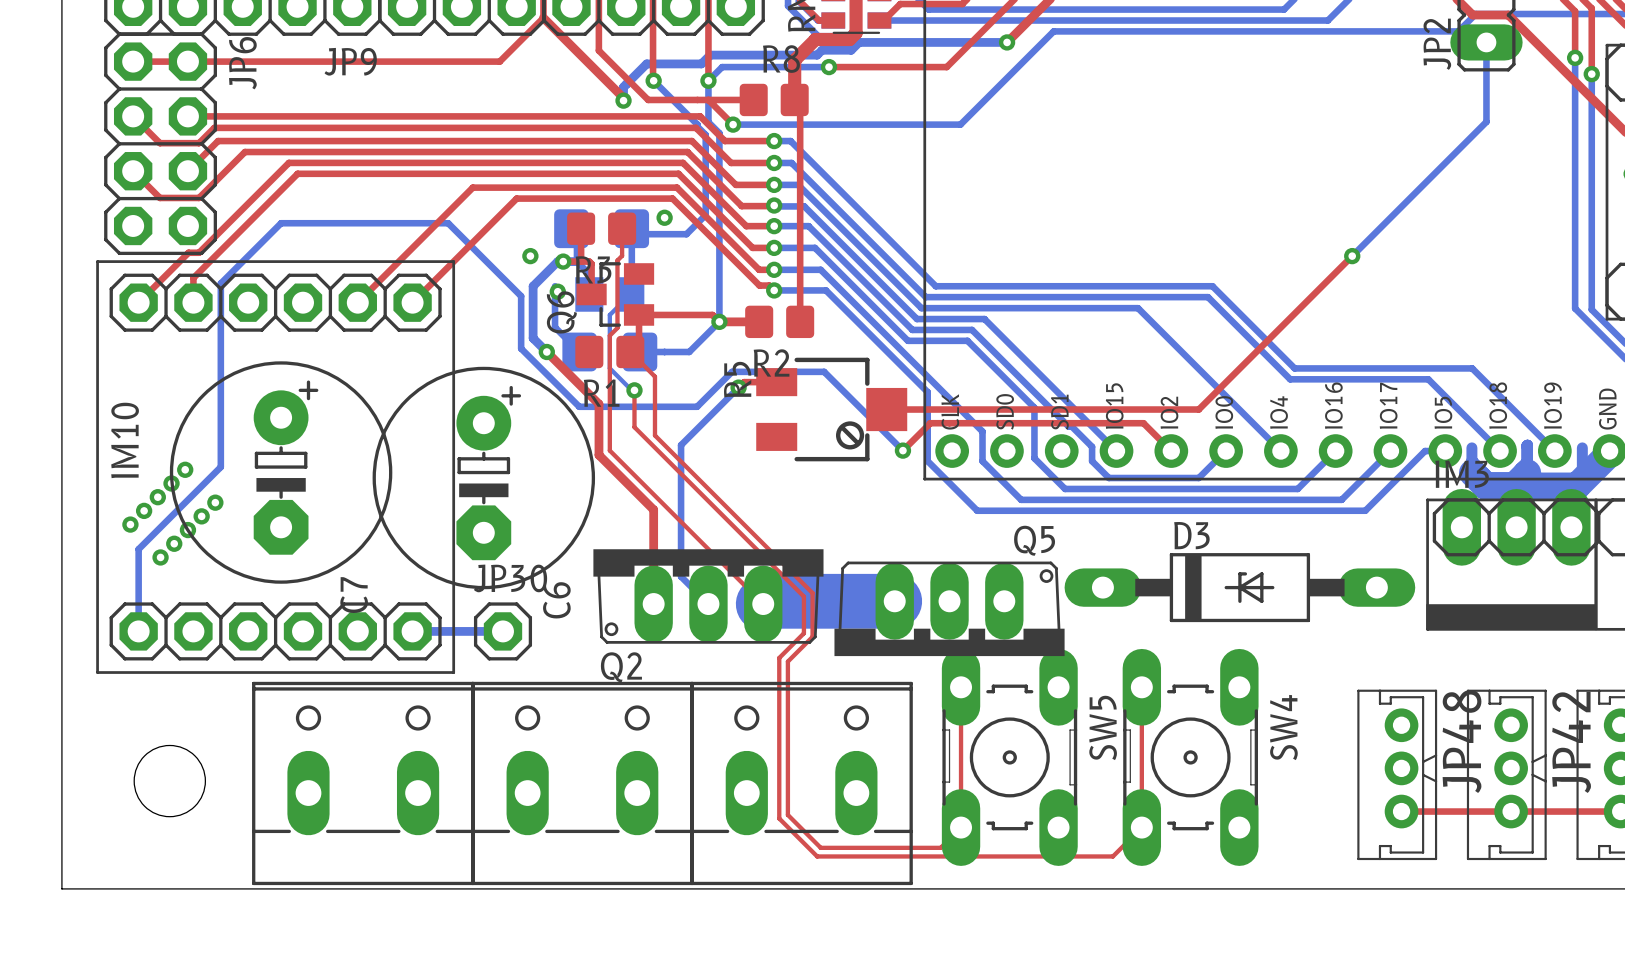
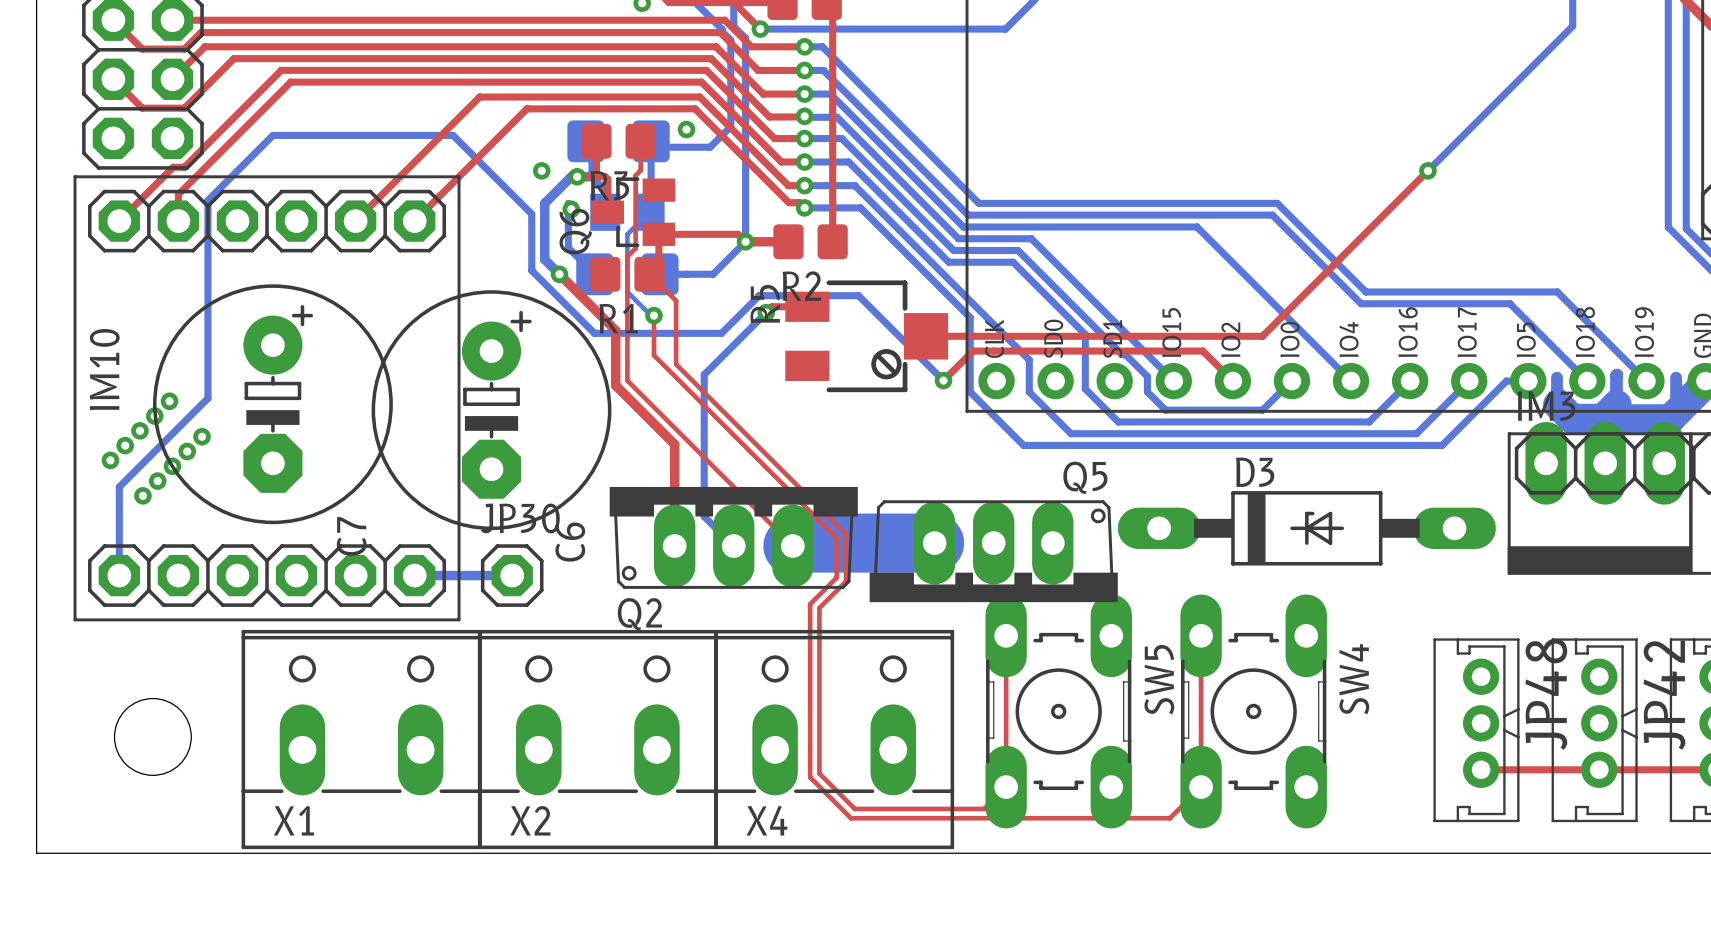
X1 name: none -> X1 (293, 820)
X2 name: none -> X2 (530, 820)
X4 name: none -> X4 (767, 820)

